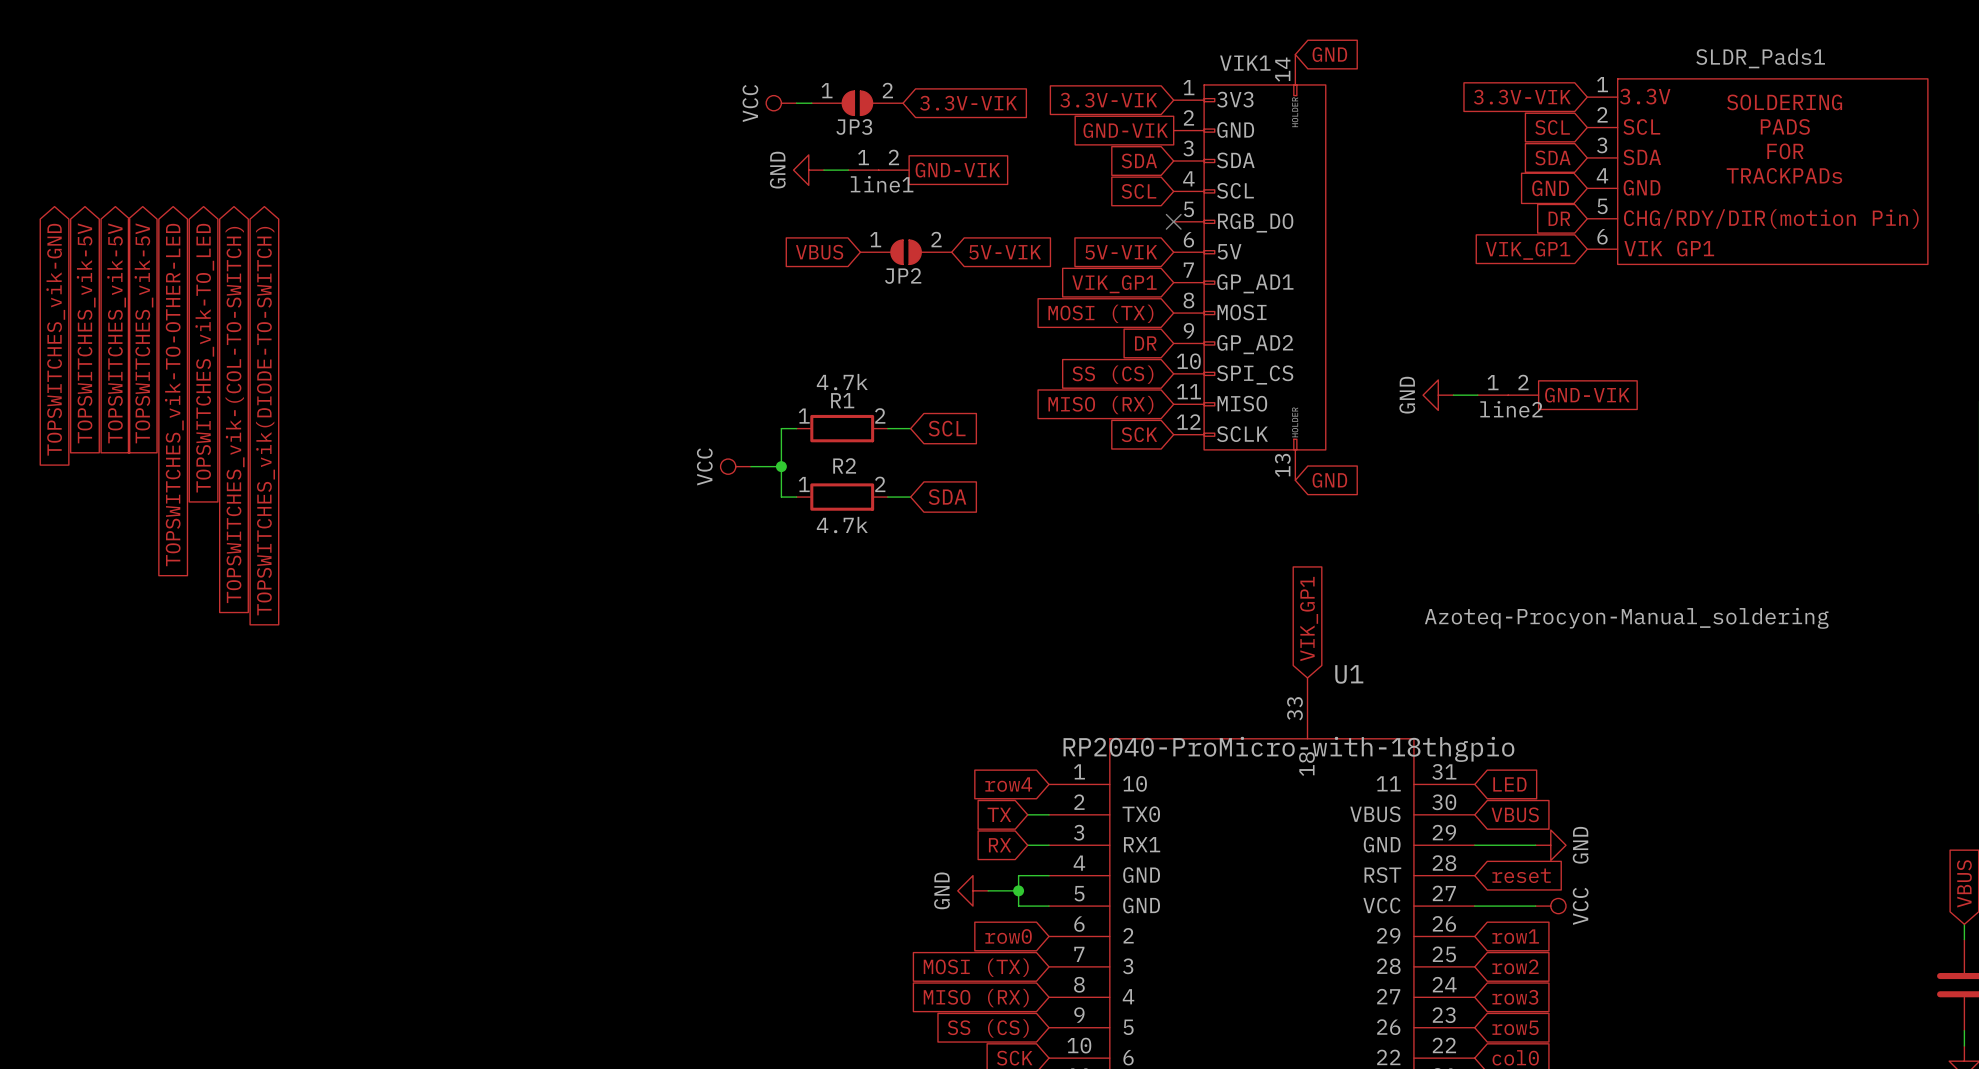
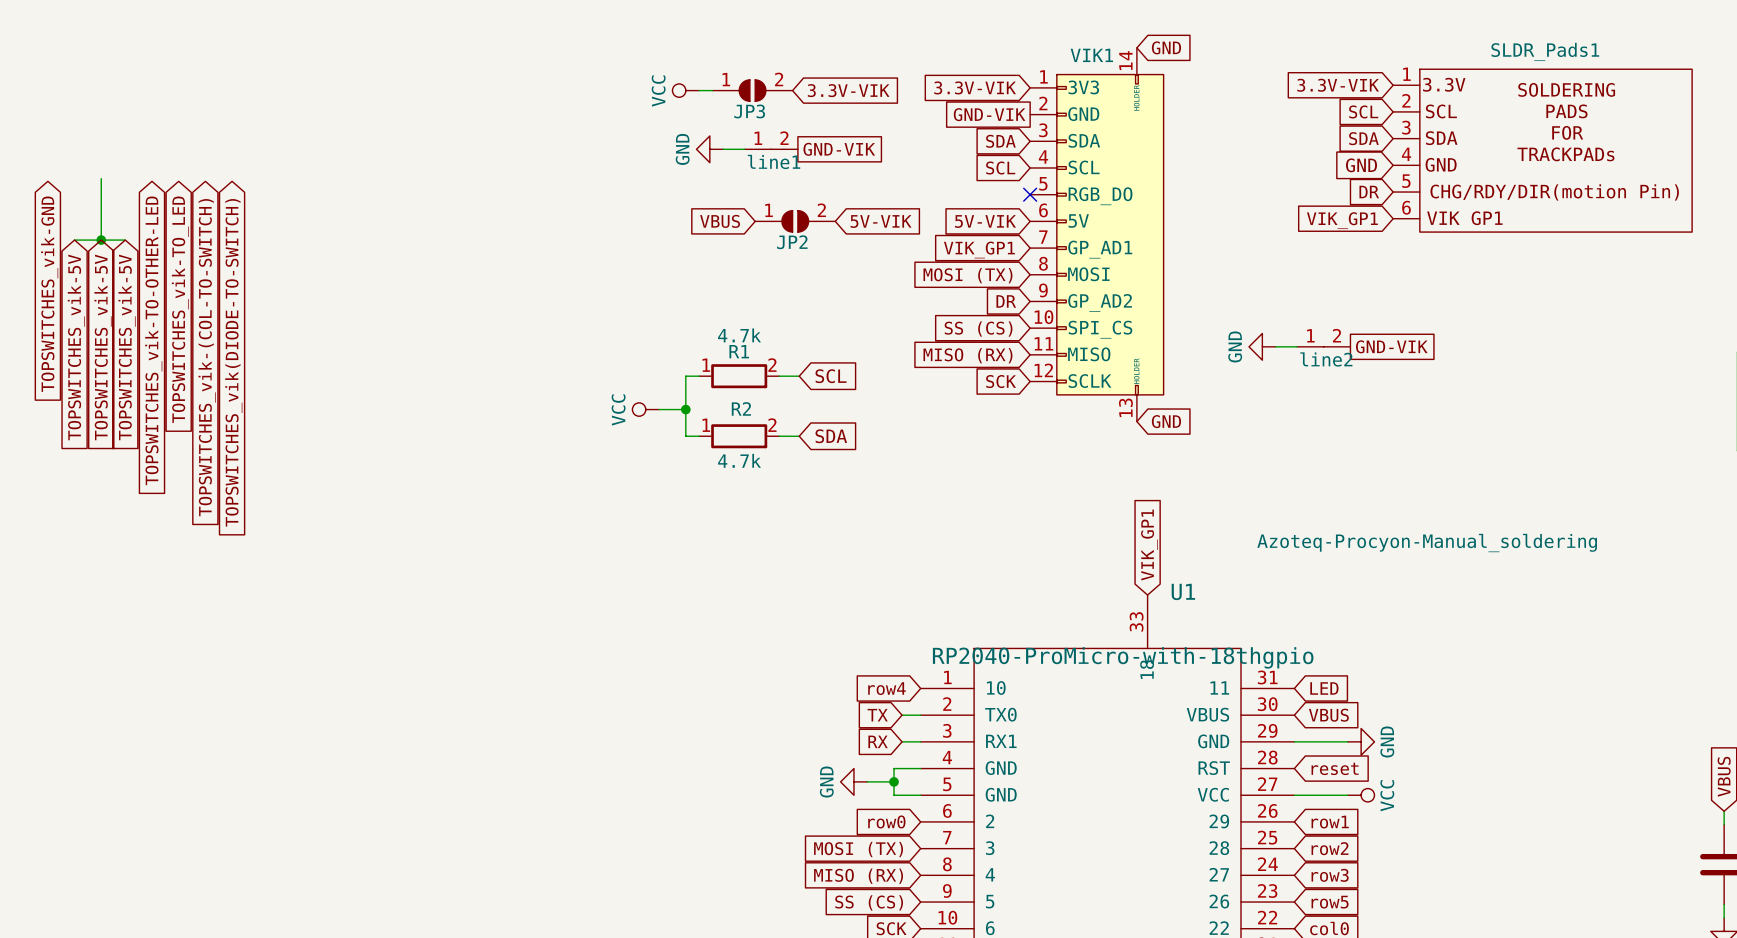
wire: none -> (101, 178) (101, 240)
wire: none -> (74, 240) (125, 240)
junction: none -> (101, 240)
global label: TOPSWITCHES_vik-5V (86, 333) -> none
global label: TOPSWITCHES_vik-5V (116, 333) -> none
global label: TOPSWITCHES_vik-5V (143, 333) -> none
global label: none -> TOPSWITCHES_vik-5V (76, 347)
global label: none -> TOPSWITCHES_vik-5V (103, 347)
global label: none -> TOPSWITCHES_vik-5V (127, 347)

